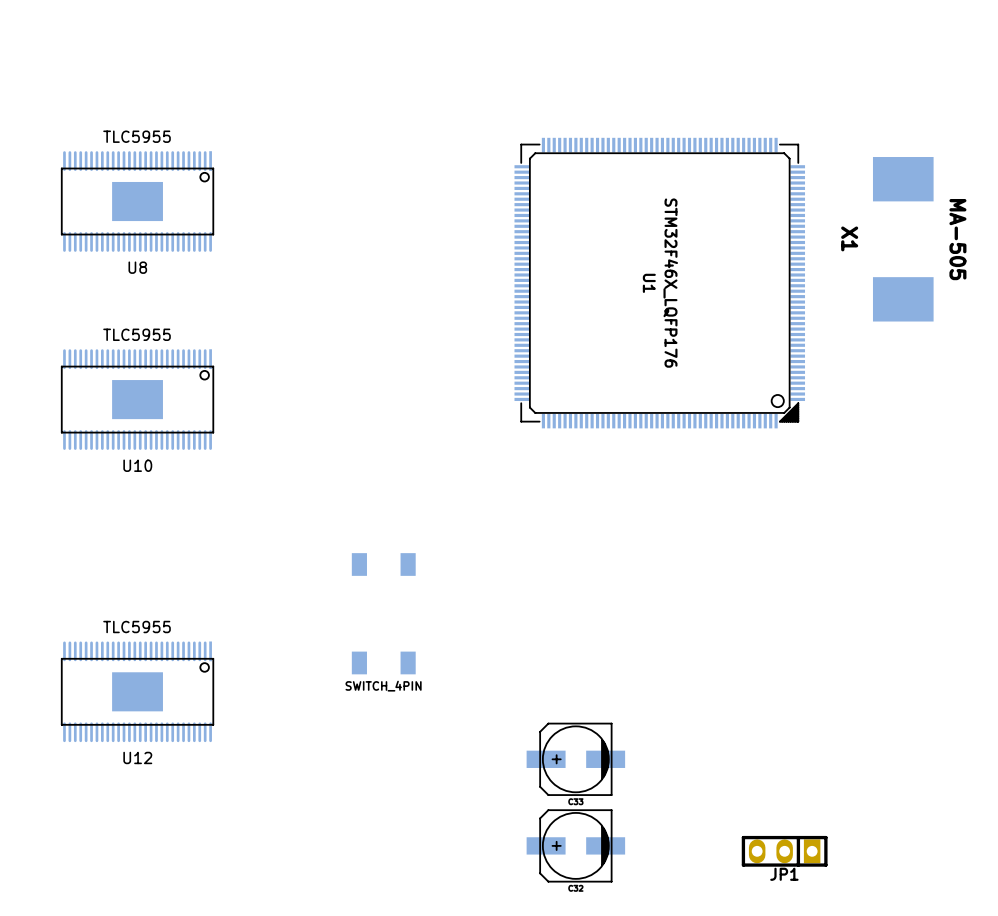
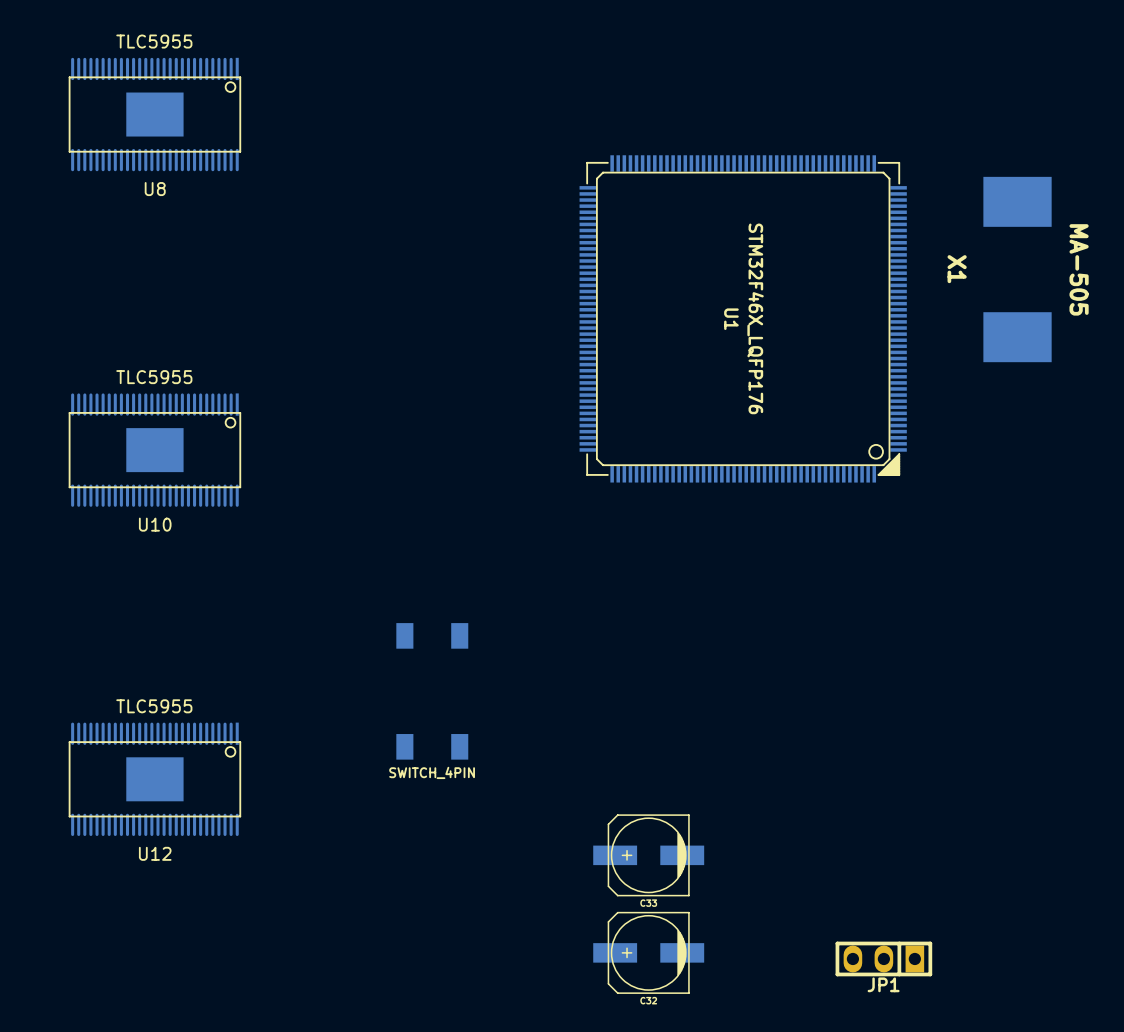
U8 position: (137, 201) -> (154, 114)

